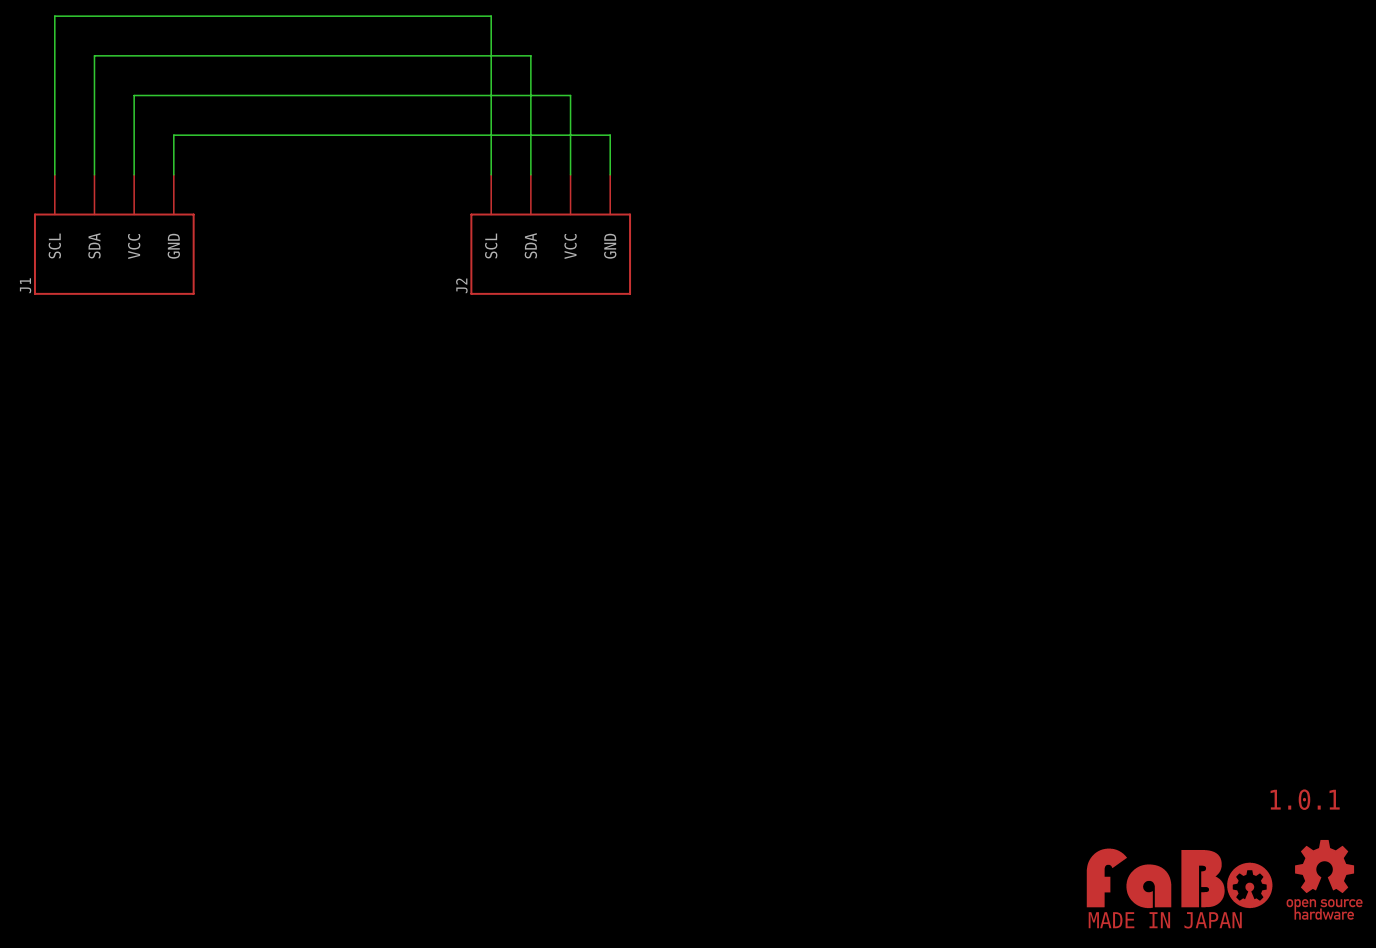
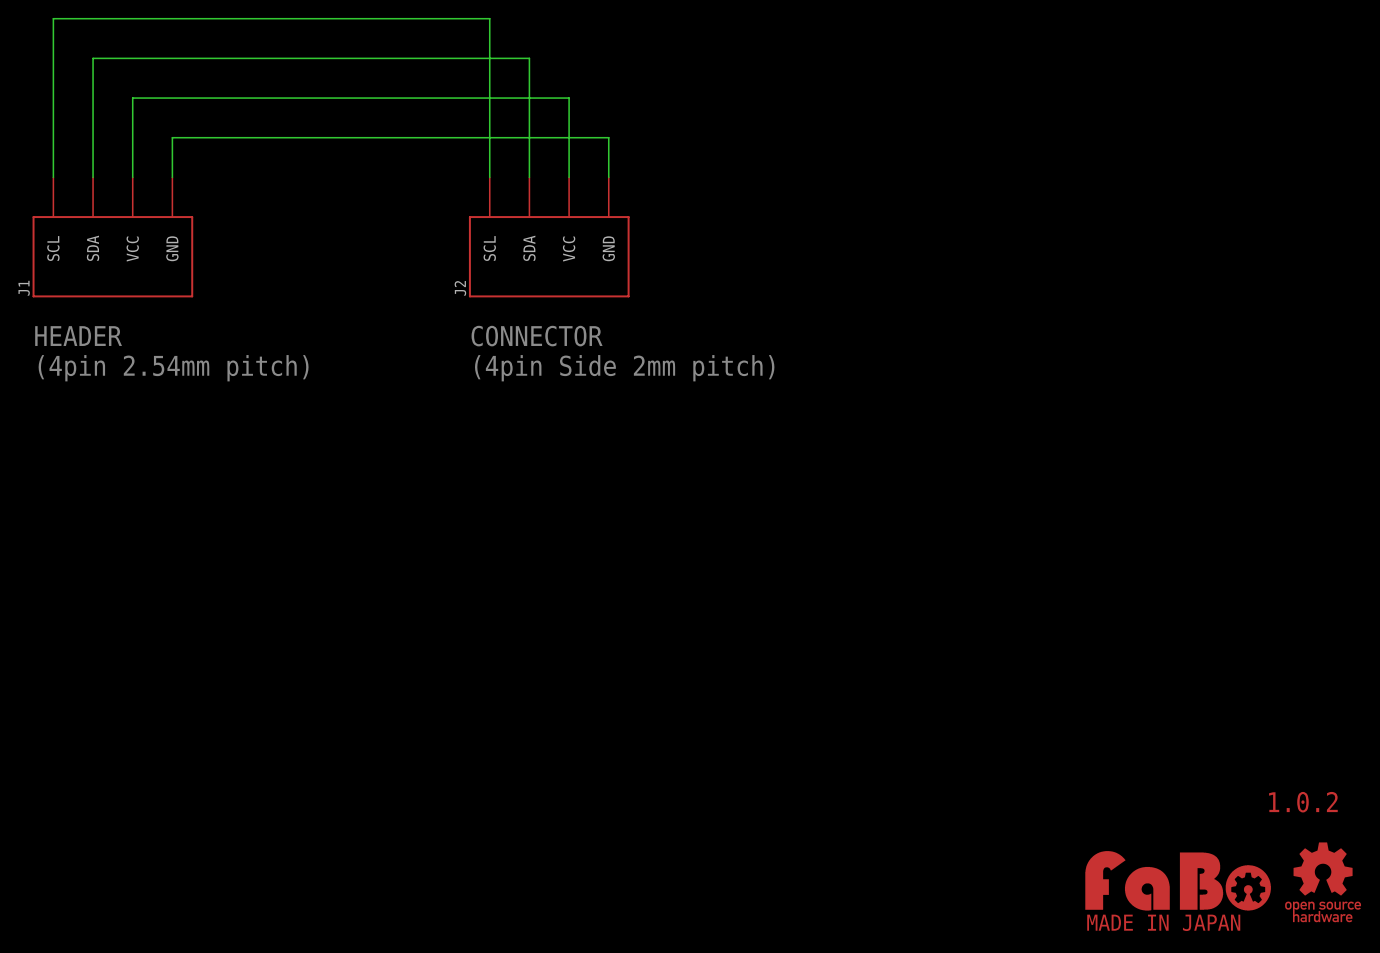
text: none -> HEADER (78, 336)
text: none -> CONNECTOR (537, 336)
text: none -> (4pin 2.54mm pitch) (173, 368)
text: none -> (4pin Side 2mm pitch) (624, 368)
text: 1.0.1 (1305, 799) -> 1.0.2 (1303, 802)

